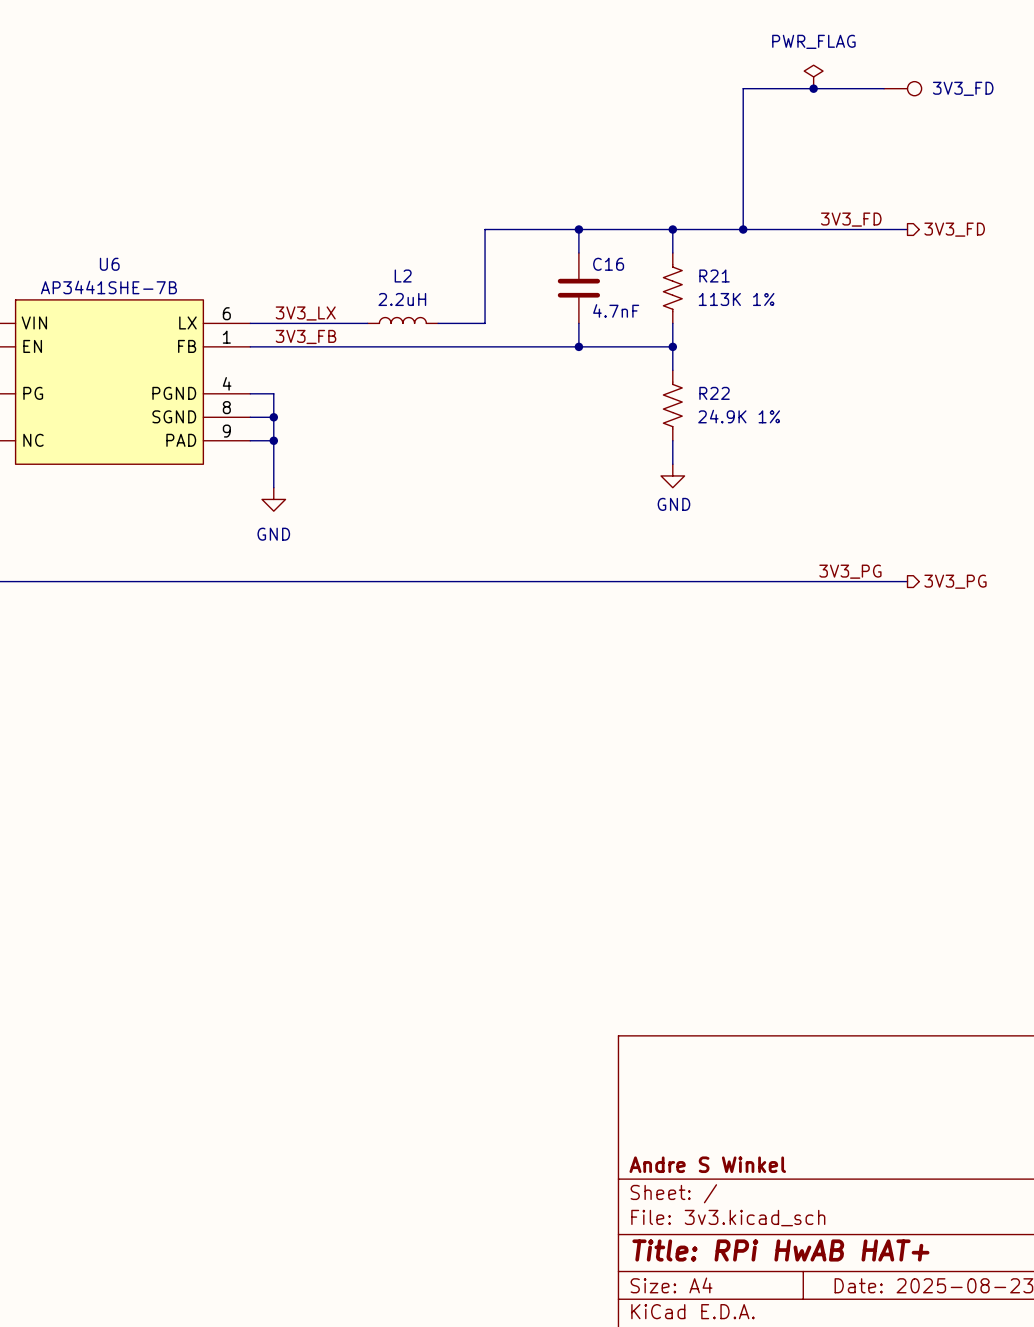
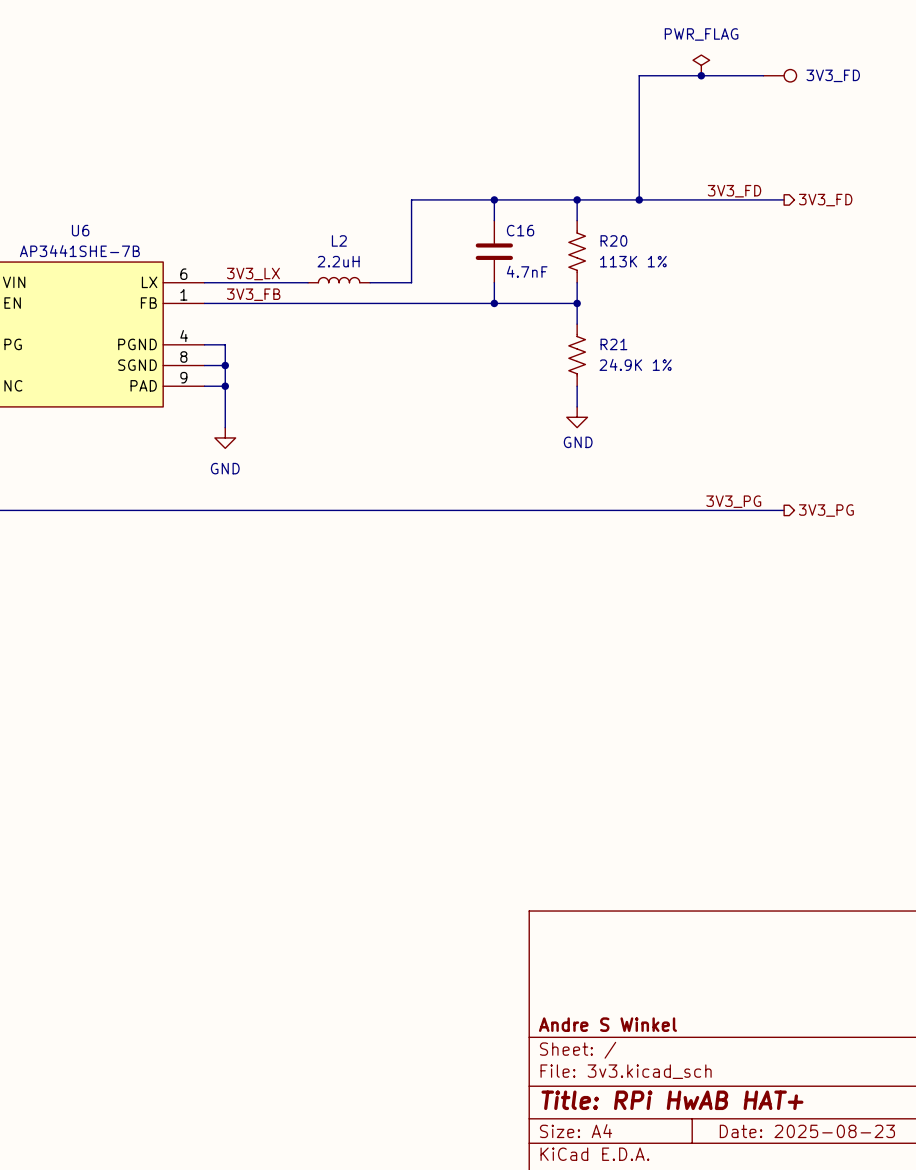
R21 name: R21 (714, 276) -> R20 (613, 240)
R22 name: R22 (714, 393) -> R21 (613, 344)

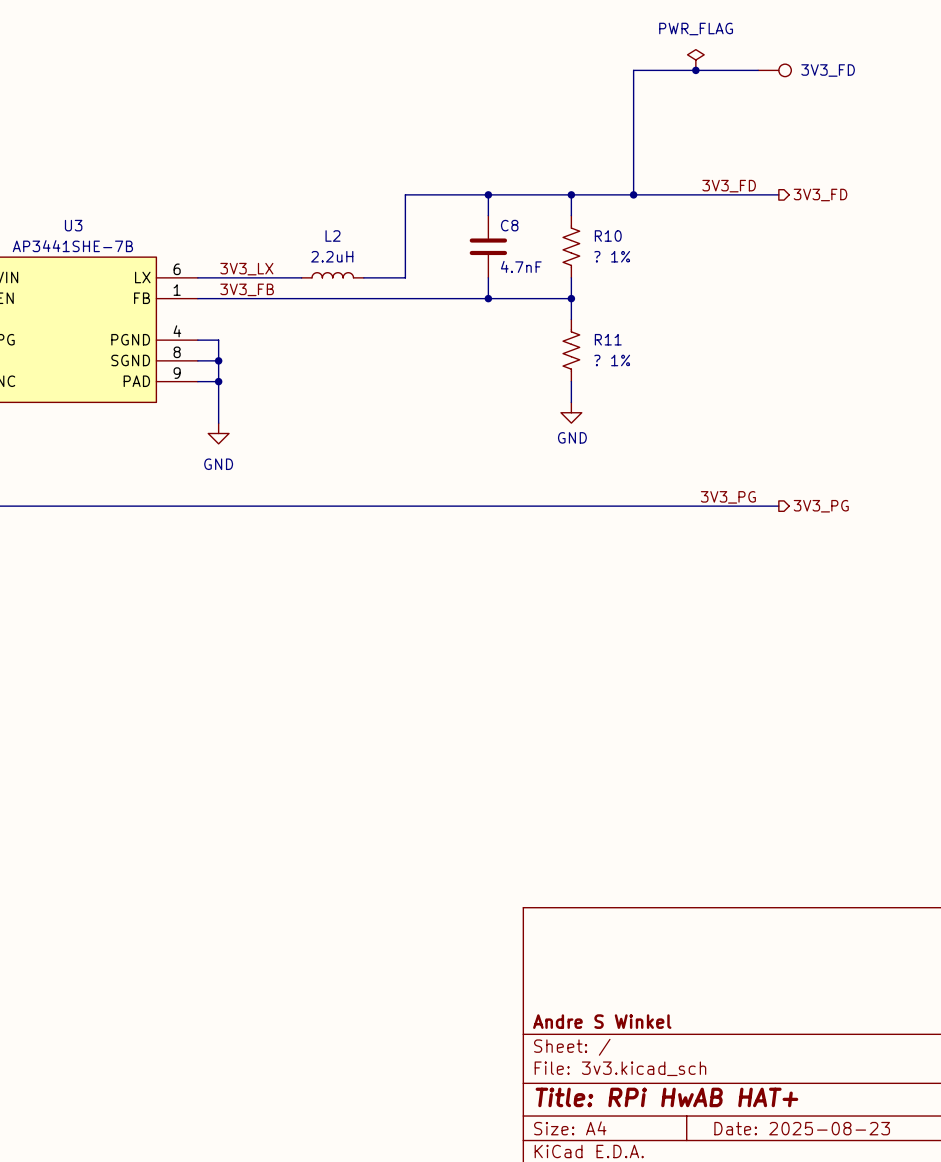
U6 name: U6 (80, 230) -> U3 (73, 225)
C16 name: C16 (520, 230) -> C8 (509, 225)
R20 name: R20 (613, 240) -> R10 (608, 235)
R20 value: 113K 1% (633, 261) -> ? 1% (612, 256)
R21 name: R21 (613, 344) -> R11 (608, 339)
R21 value: 24.9K 1% (635, 364) -> ? 1% (612, 360)

